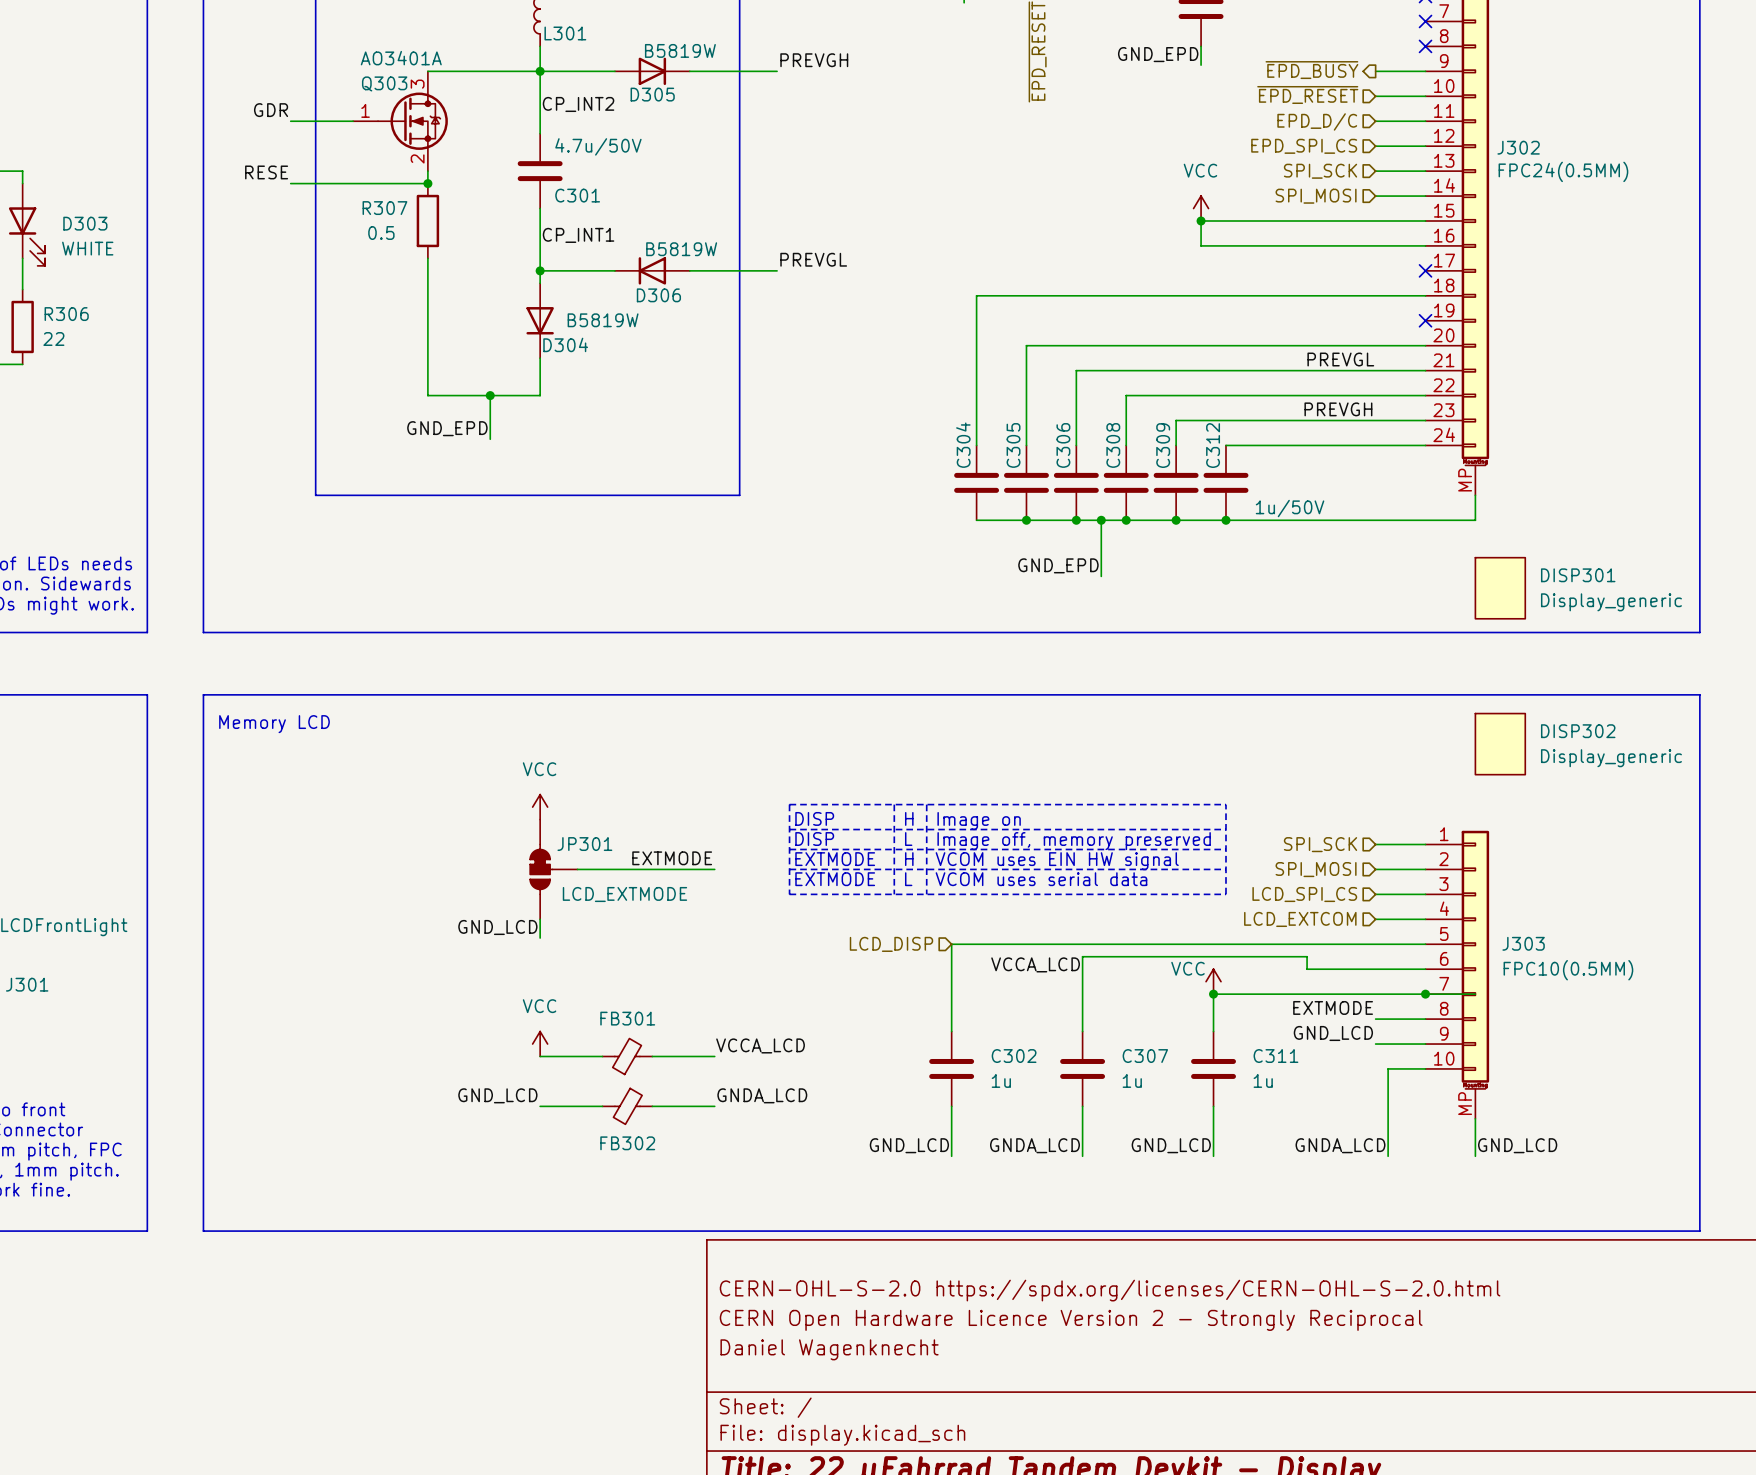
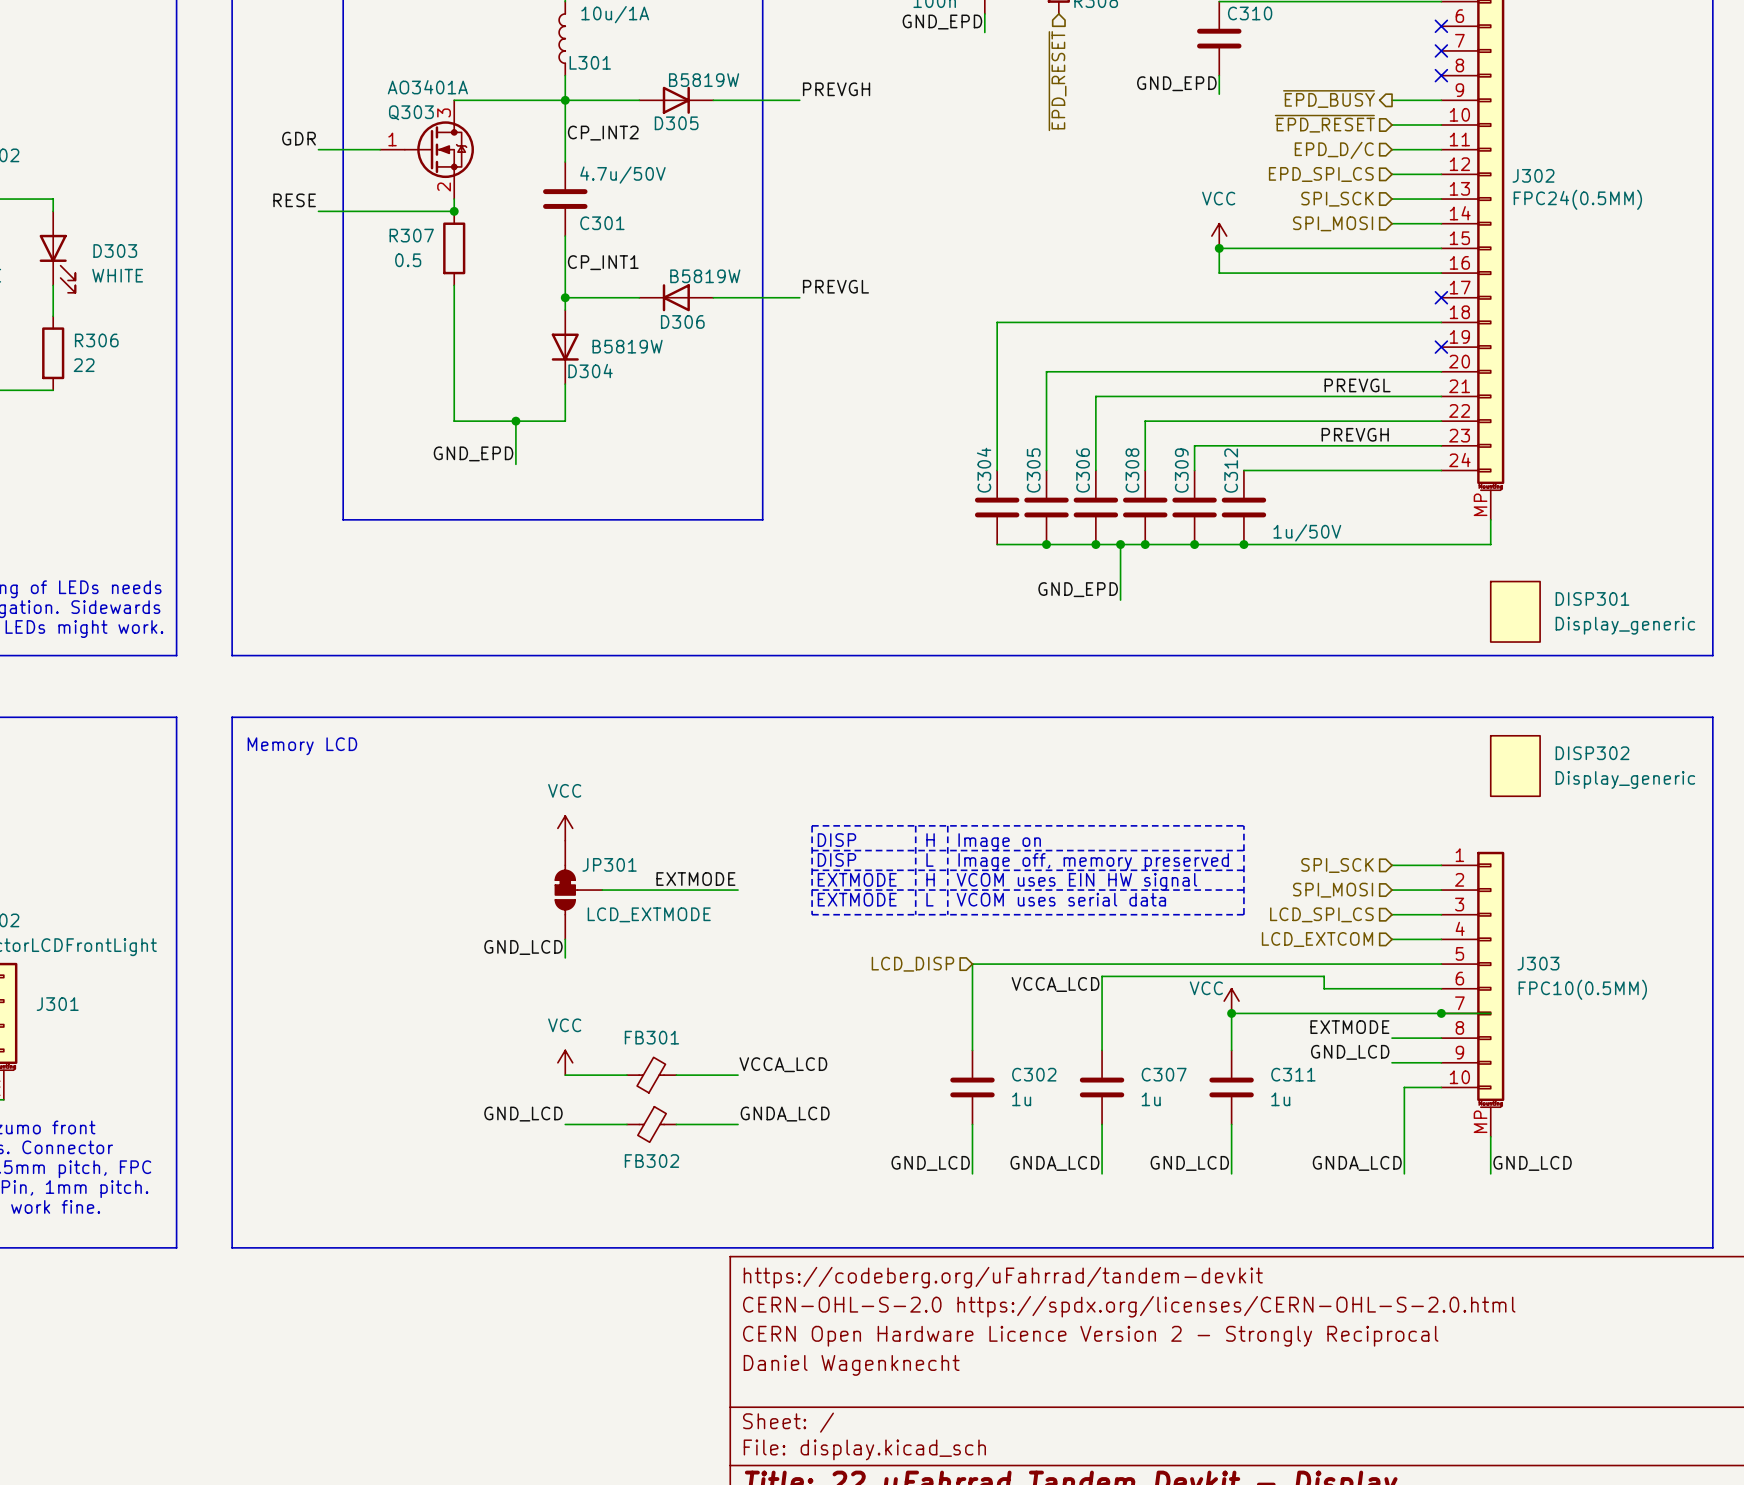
title block: none -> https://codeberg.org/uFahrrad/tandem-devkit (1003, 1277)

